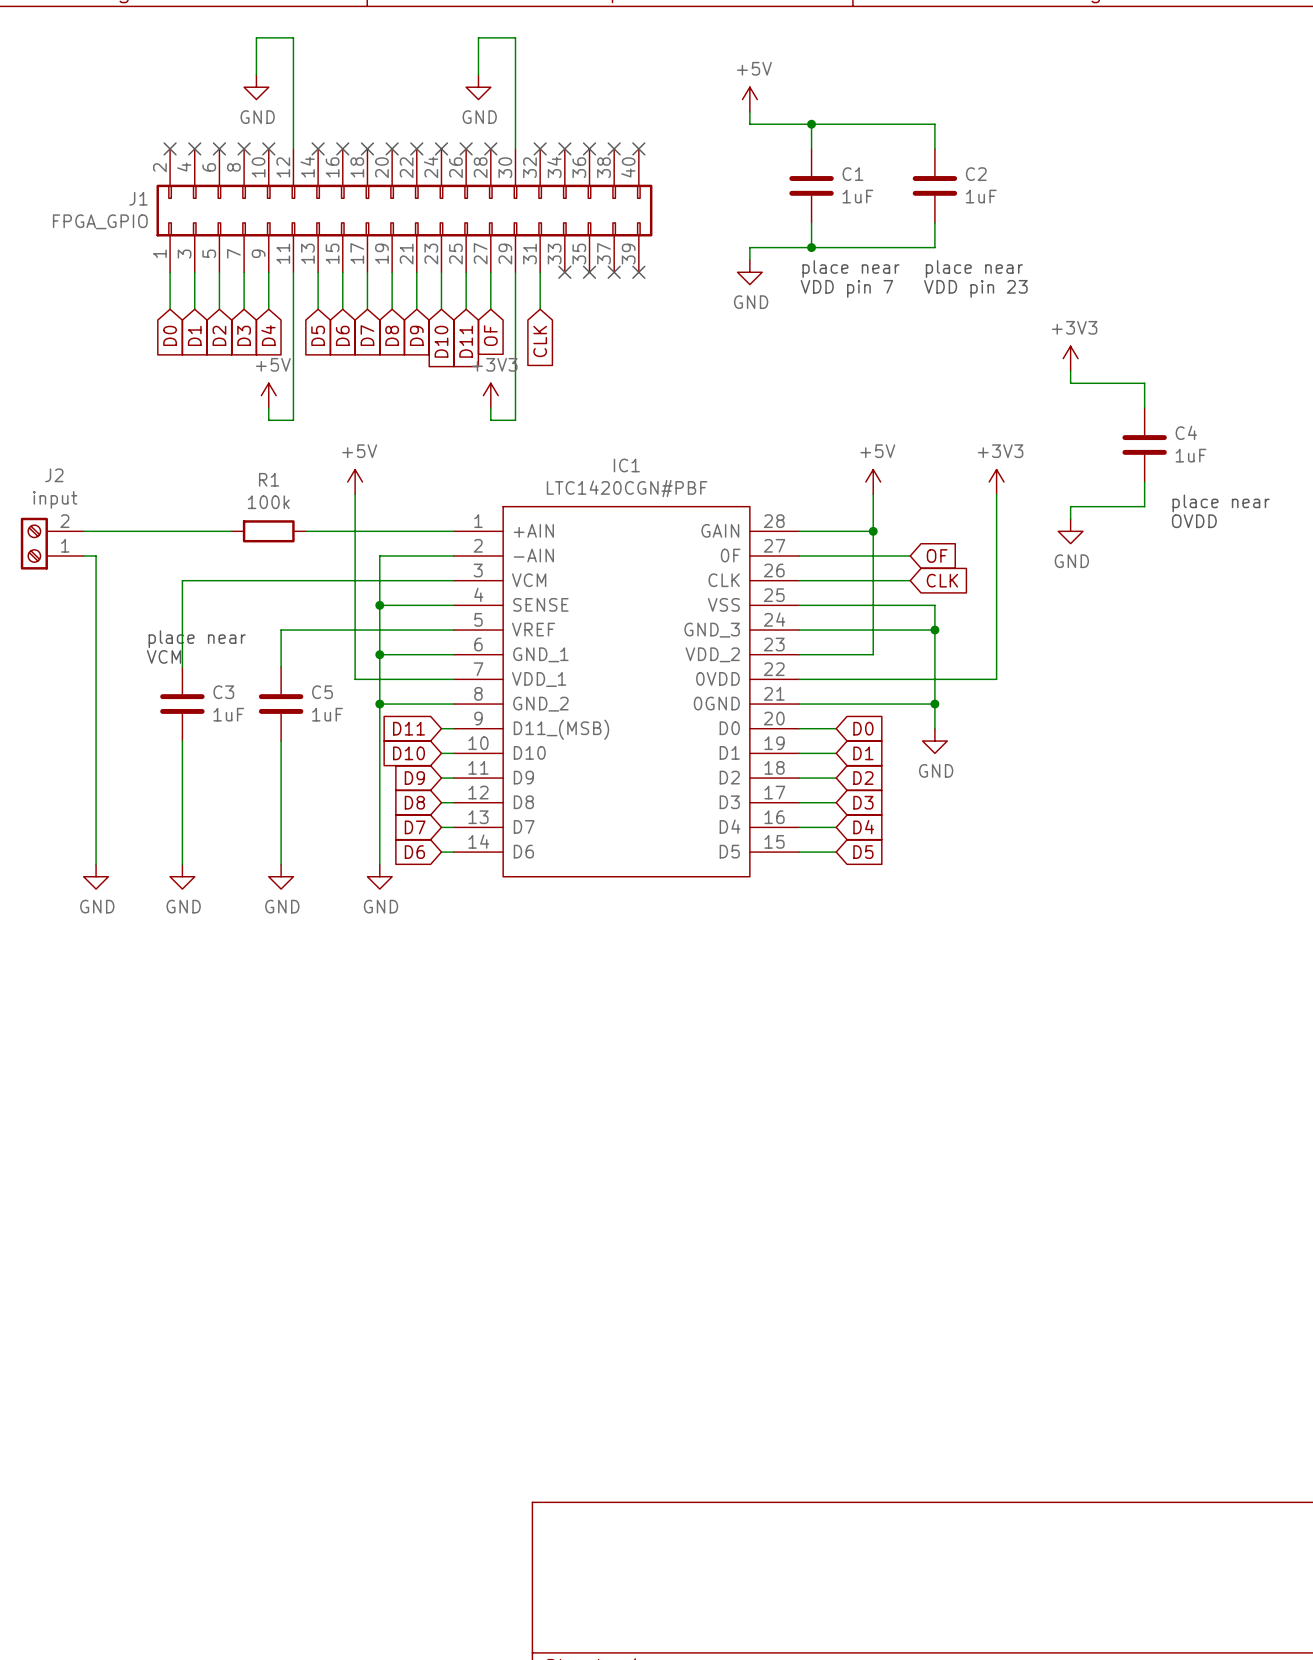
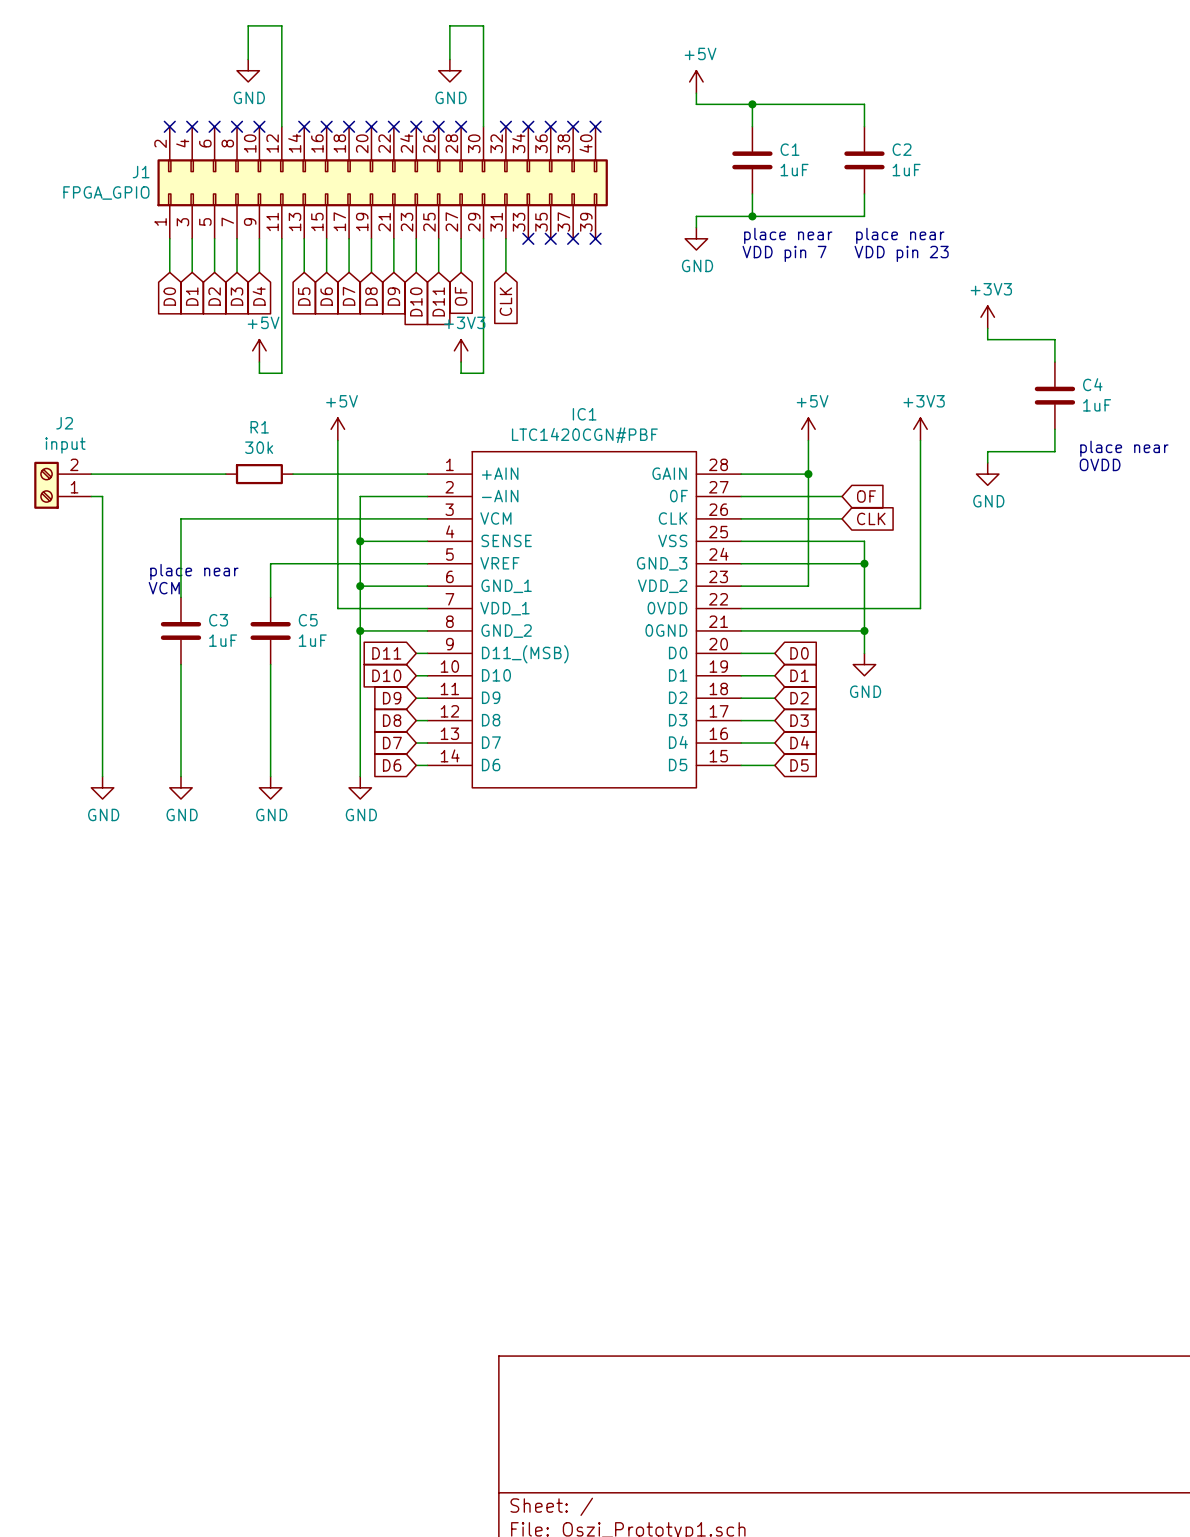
R1 value: 100k (268, 502) -> 30k (259, 447)

